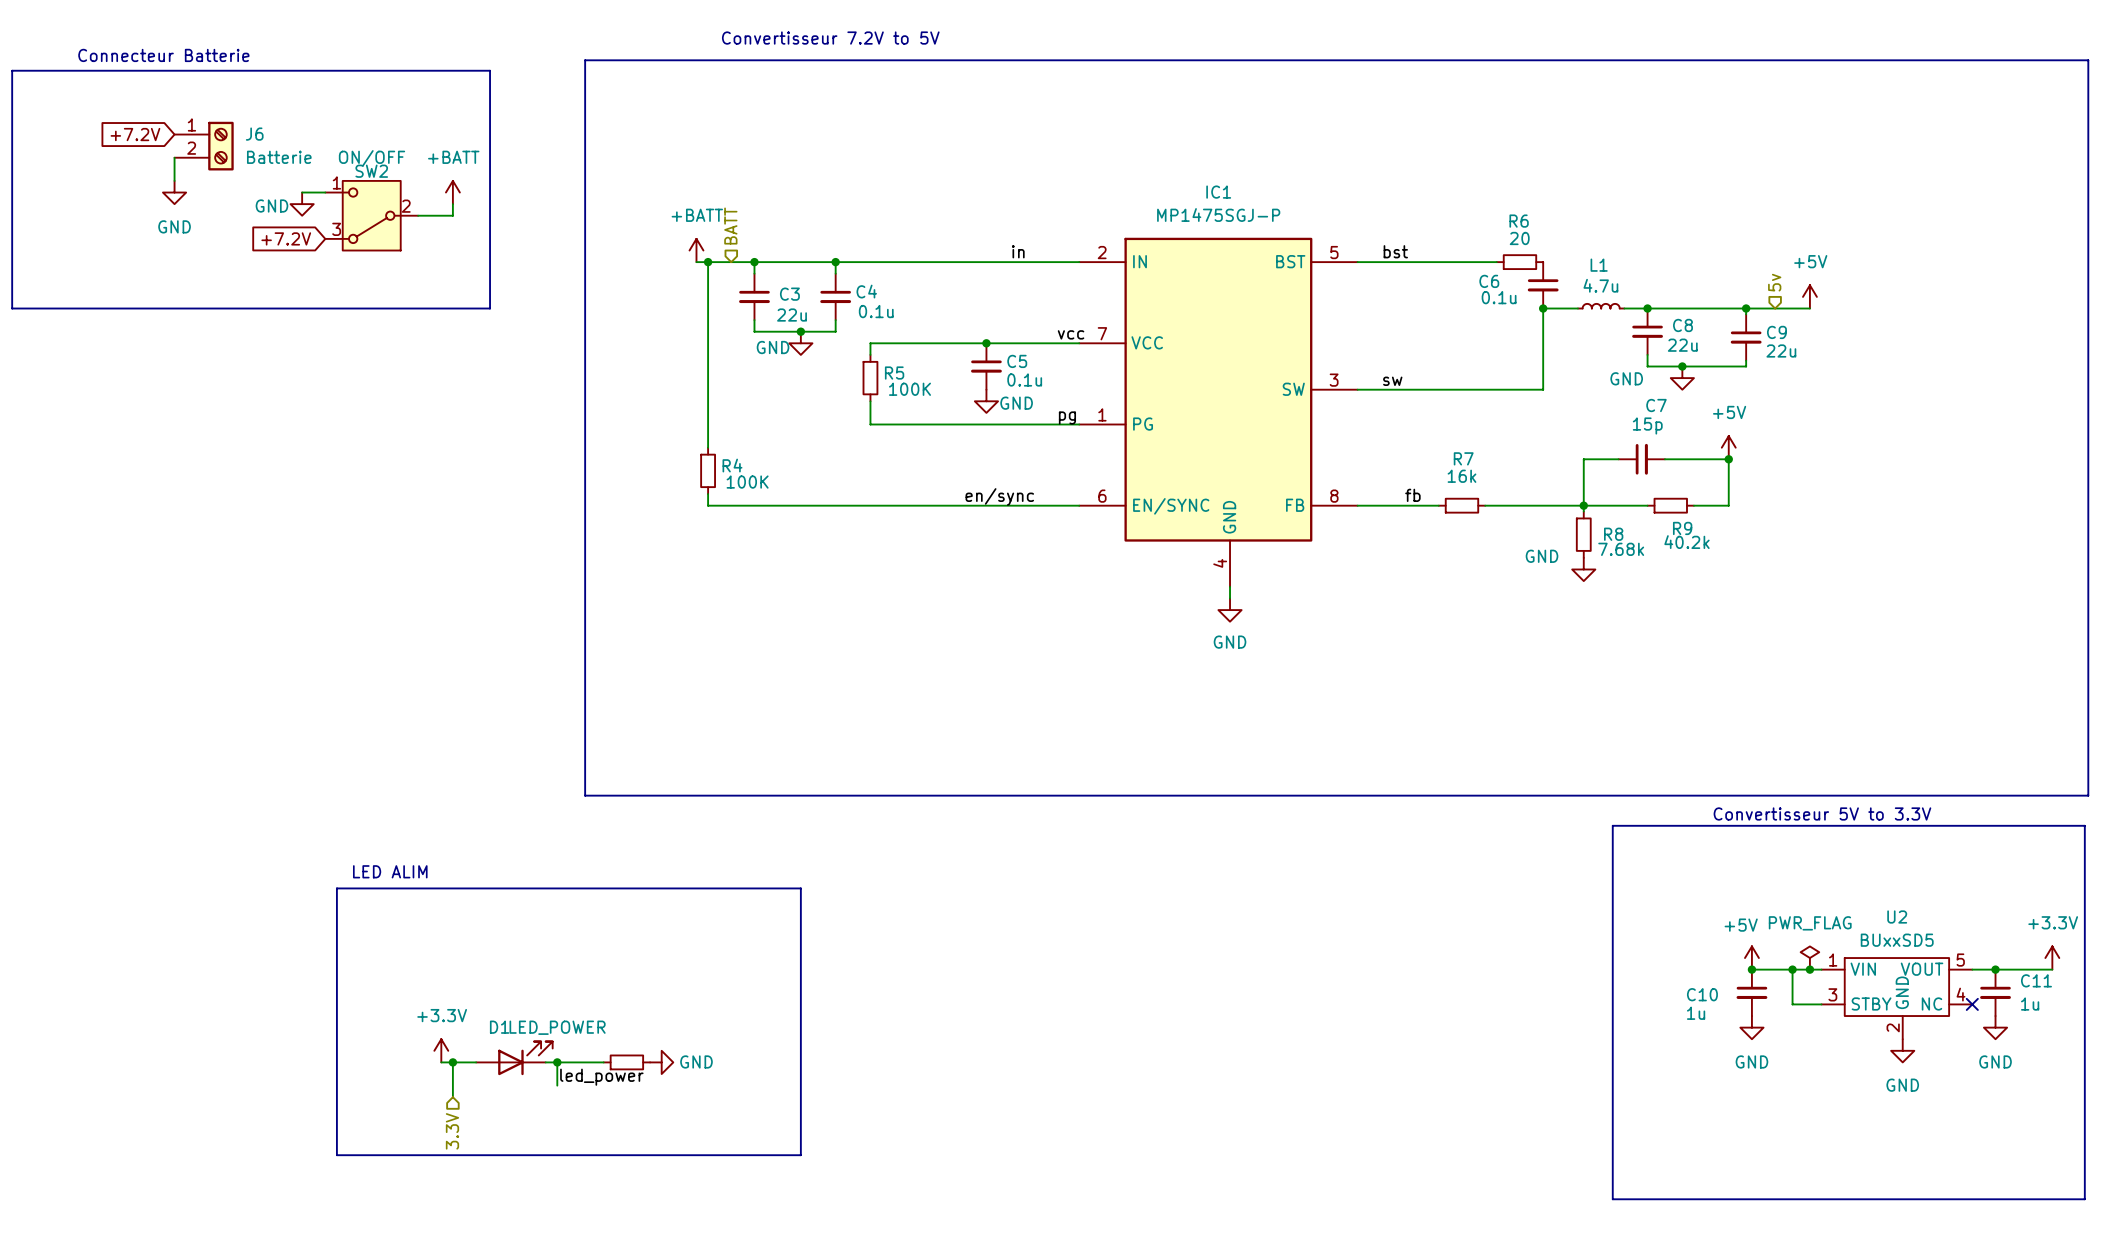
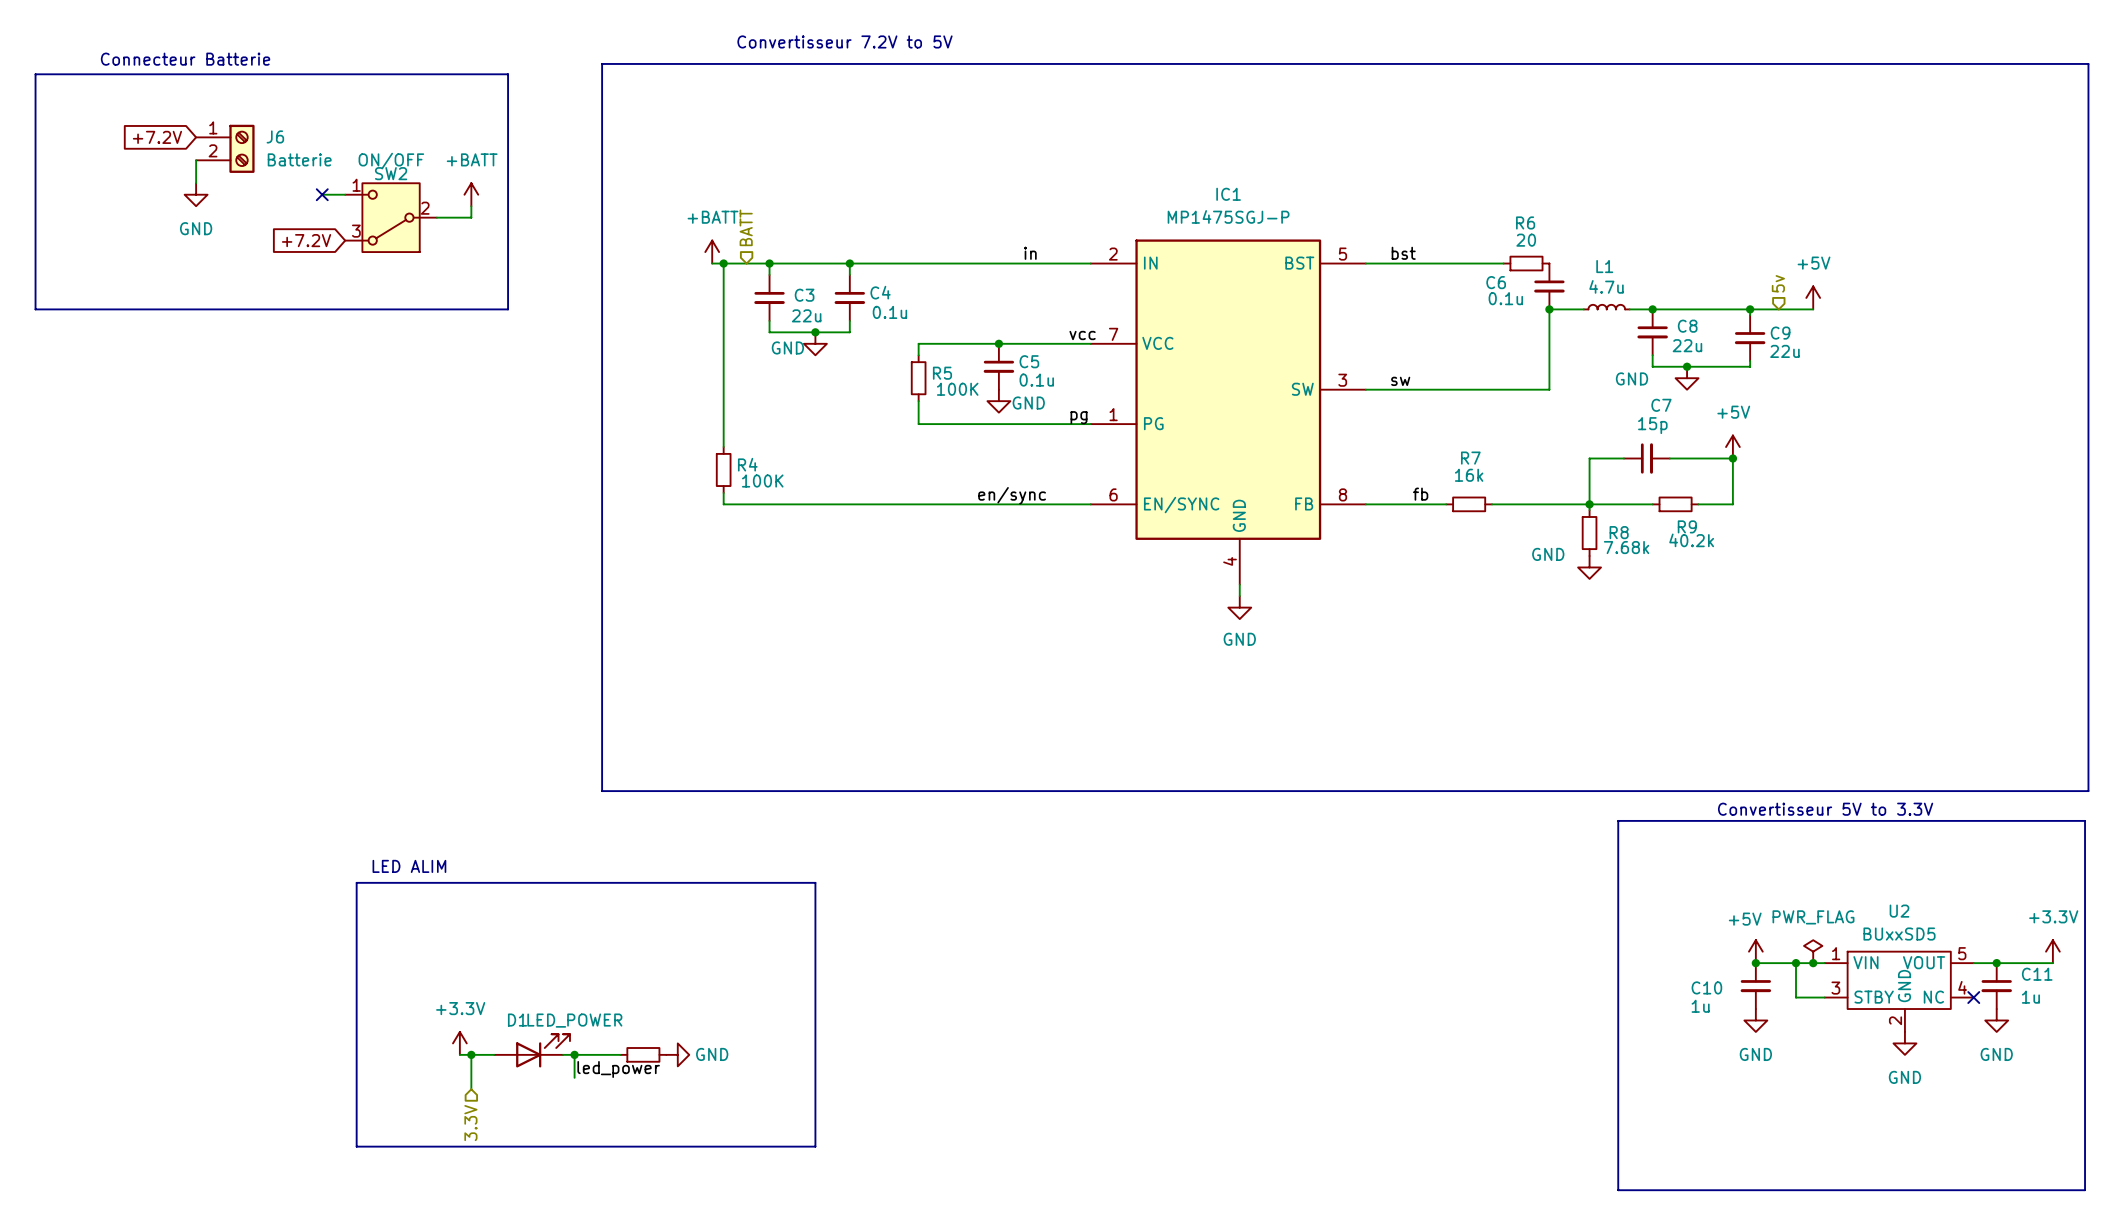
no-connect mark: none -> (322, 194)
power symbol: GND (302, 204) -> none
wire: (905, 343) (870, 343) (870, 354) -> (918, 343) (918, 355)
R5 position: (870, 378) -> (918, 378)
wire: (870, 401) (870, 424) (905, 424) -> (918, 401) (918, 424)

